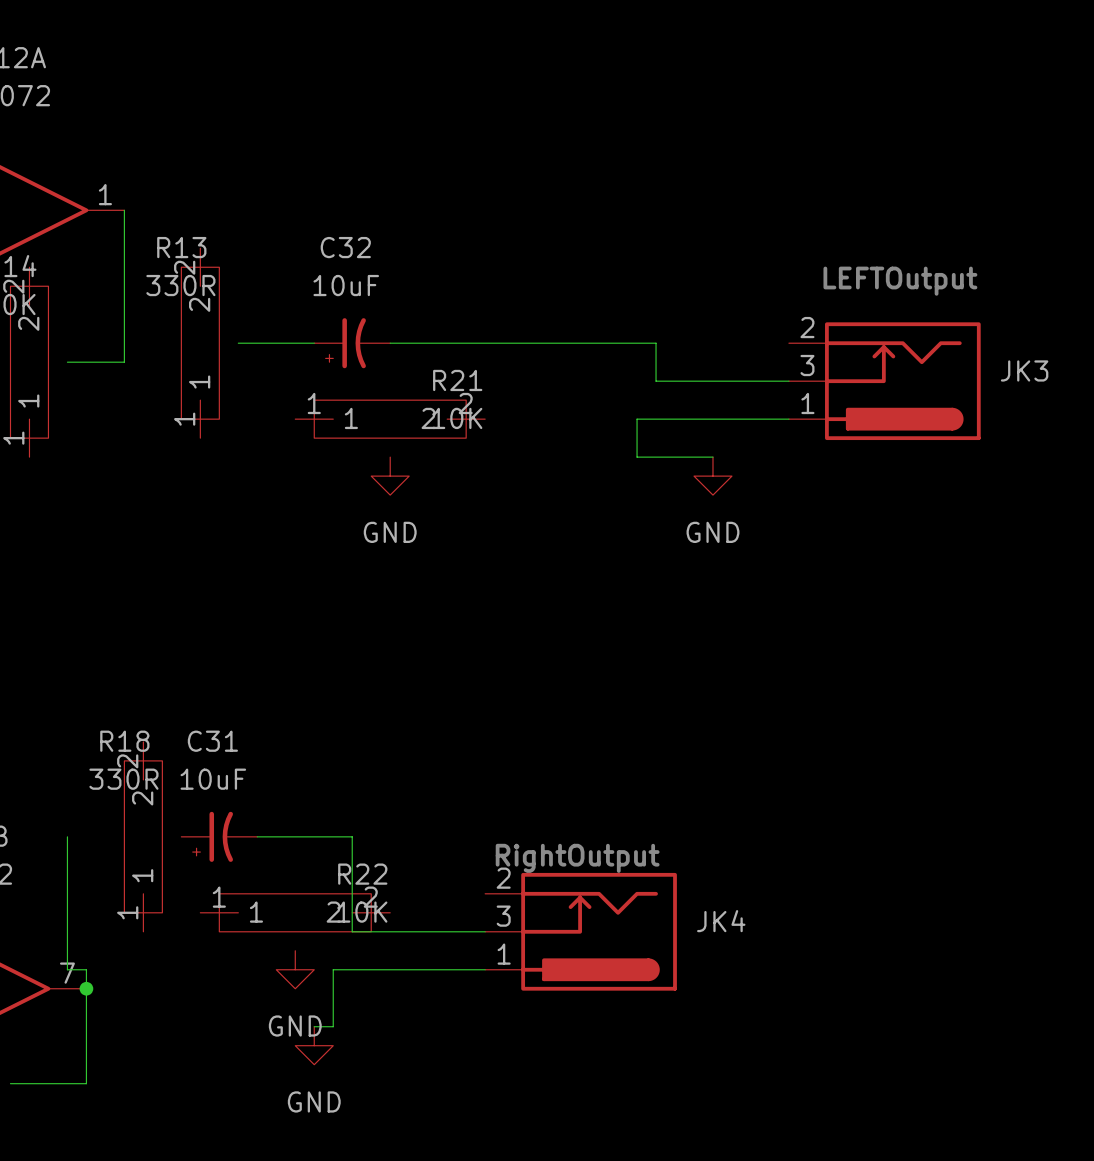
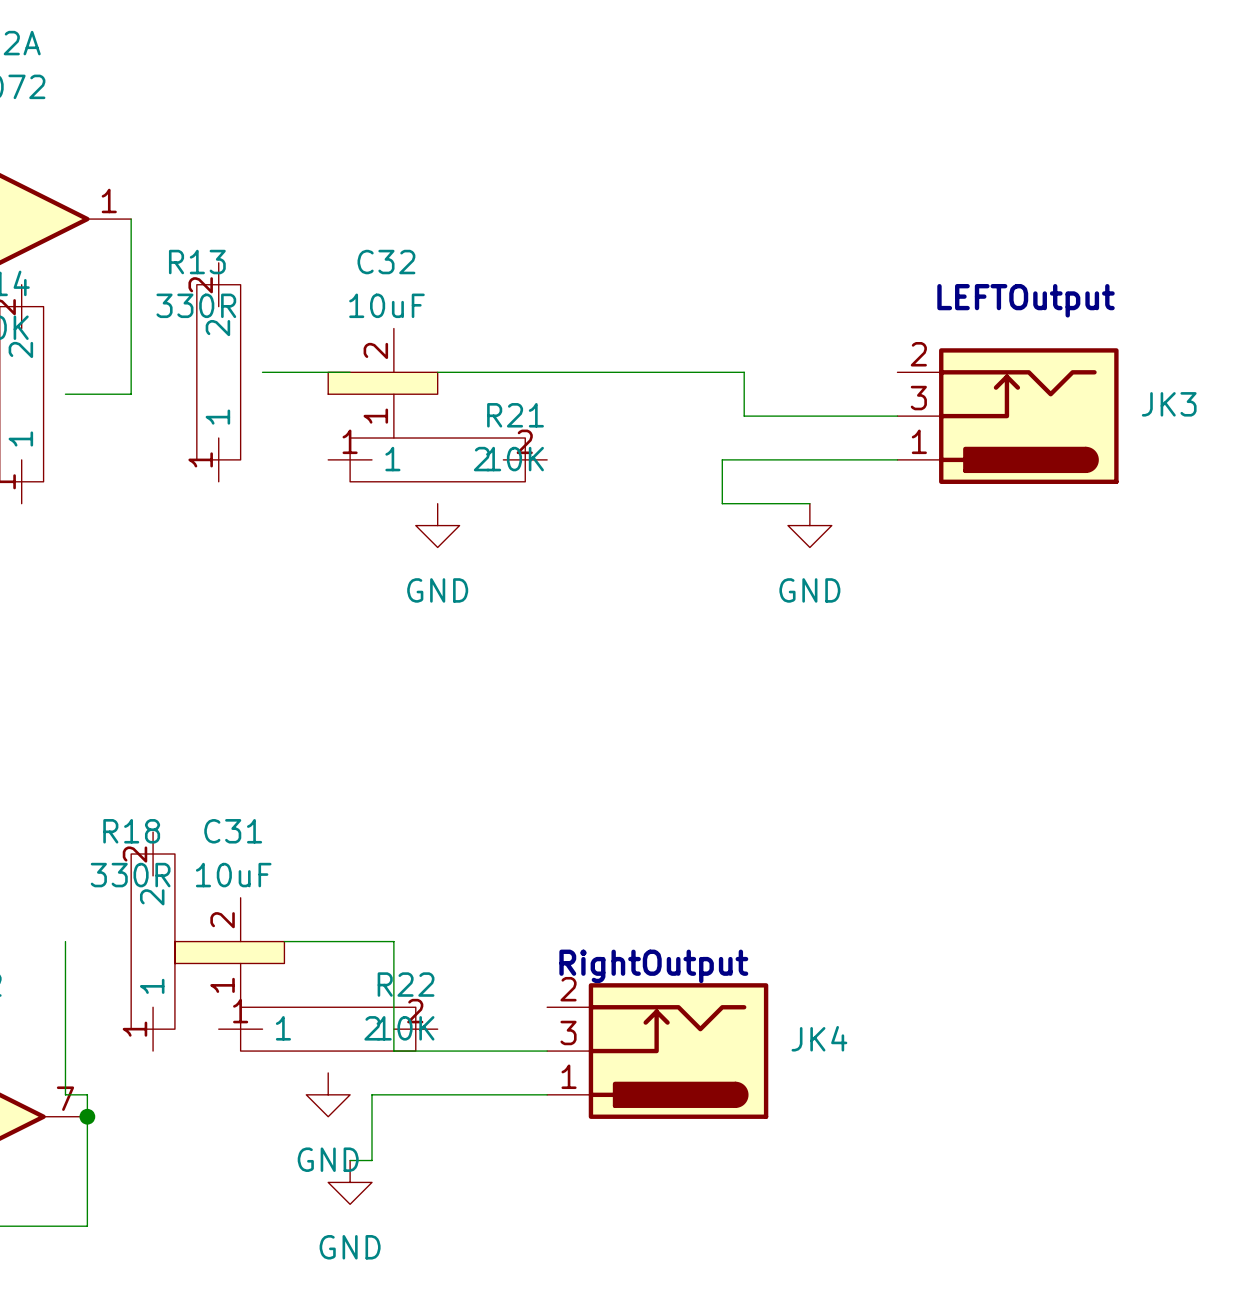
C32 symbol: [314, 318, 391, 369] -> [328, 328, 438, 439]
C31 symbol: [181, 811, 258, 862] -> [174, 897, 285, 1008]

